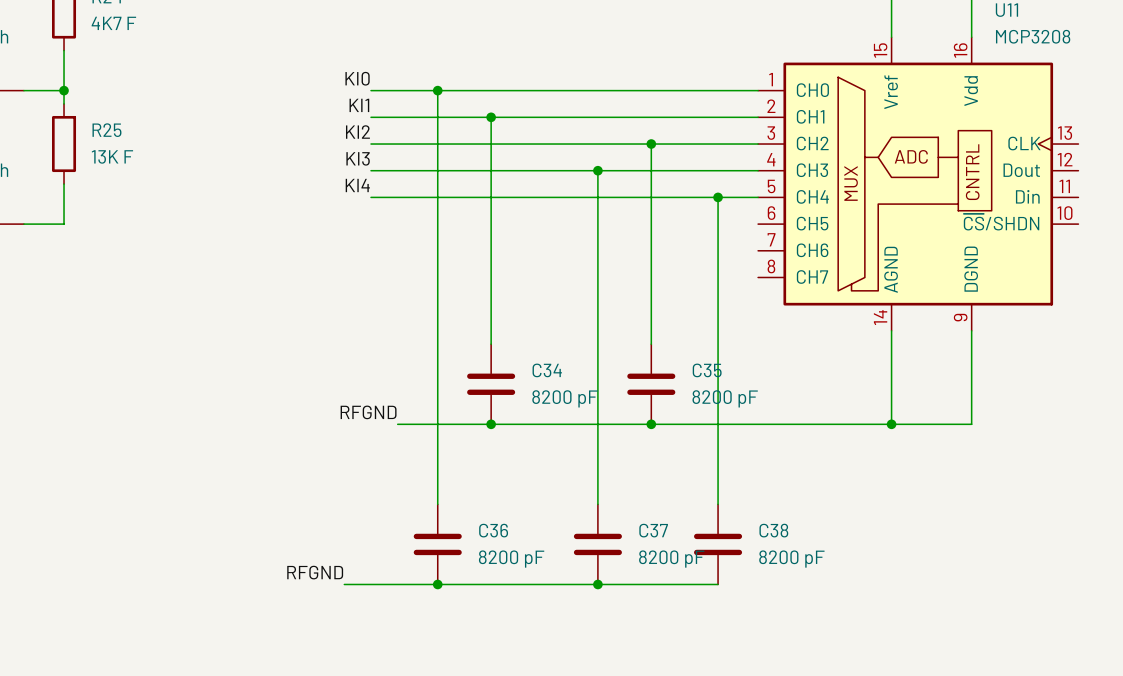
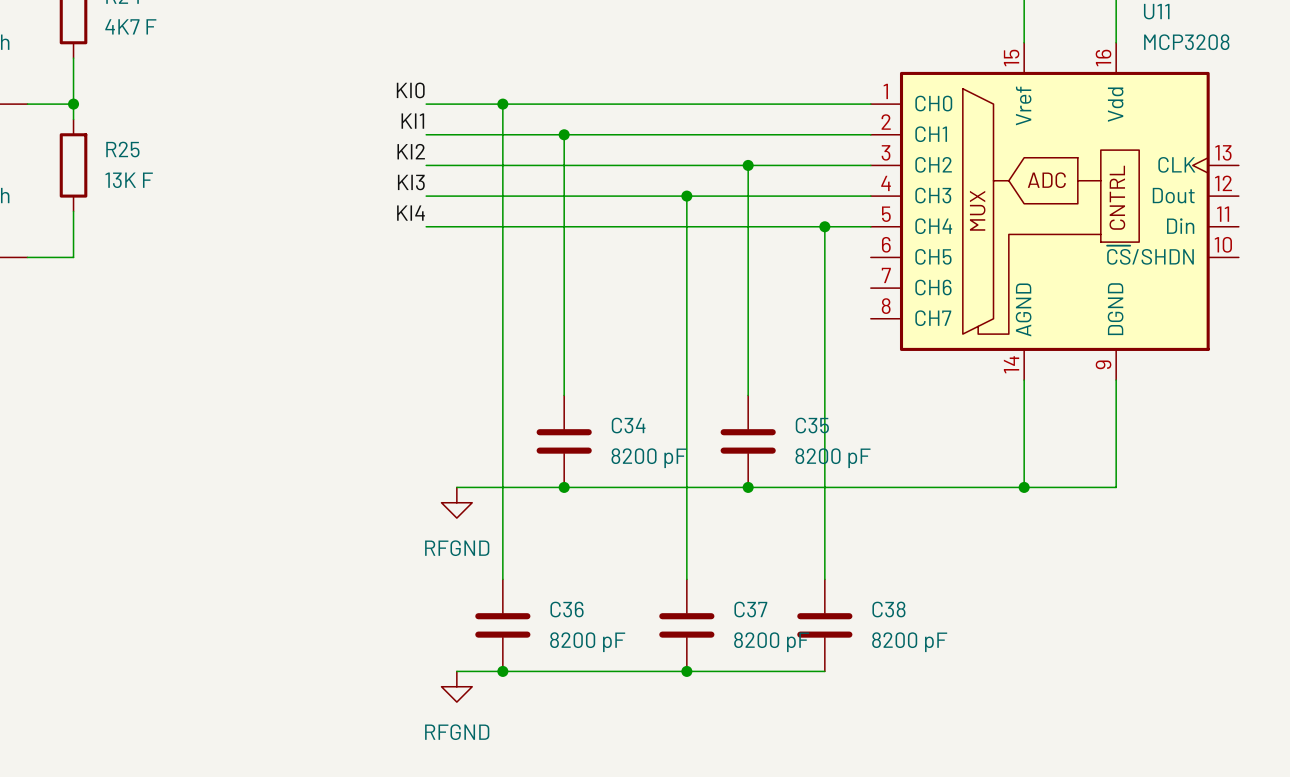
label: RFGND (368, 412) -> none
power symbol: none -> RFGND (456, 502)
label: RFGND (315, 572) -> none
wire: (344, 584) (397, 584) -> none
power symbol: none -> RFGND (456, 686)

